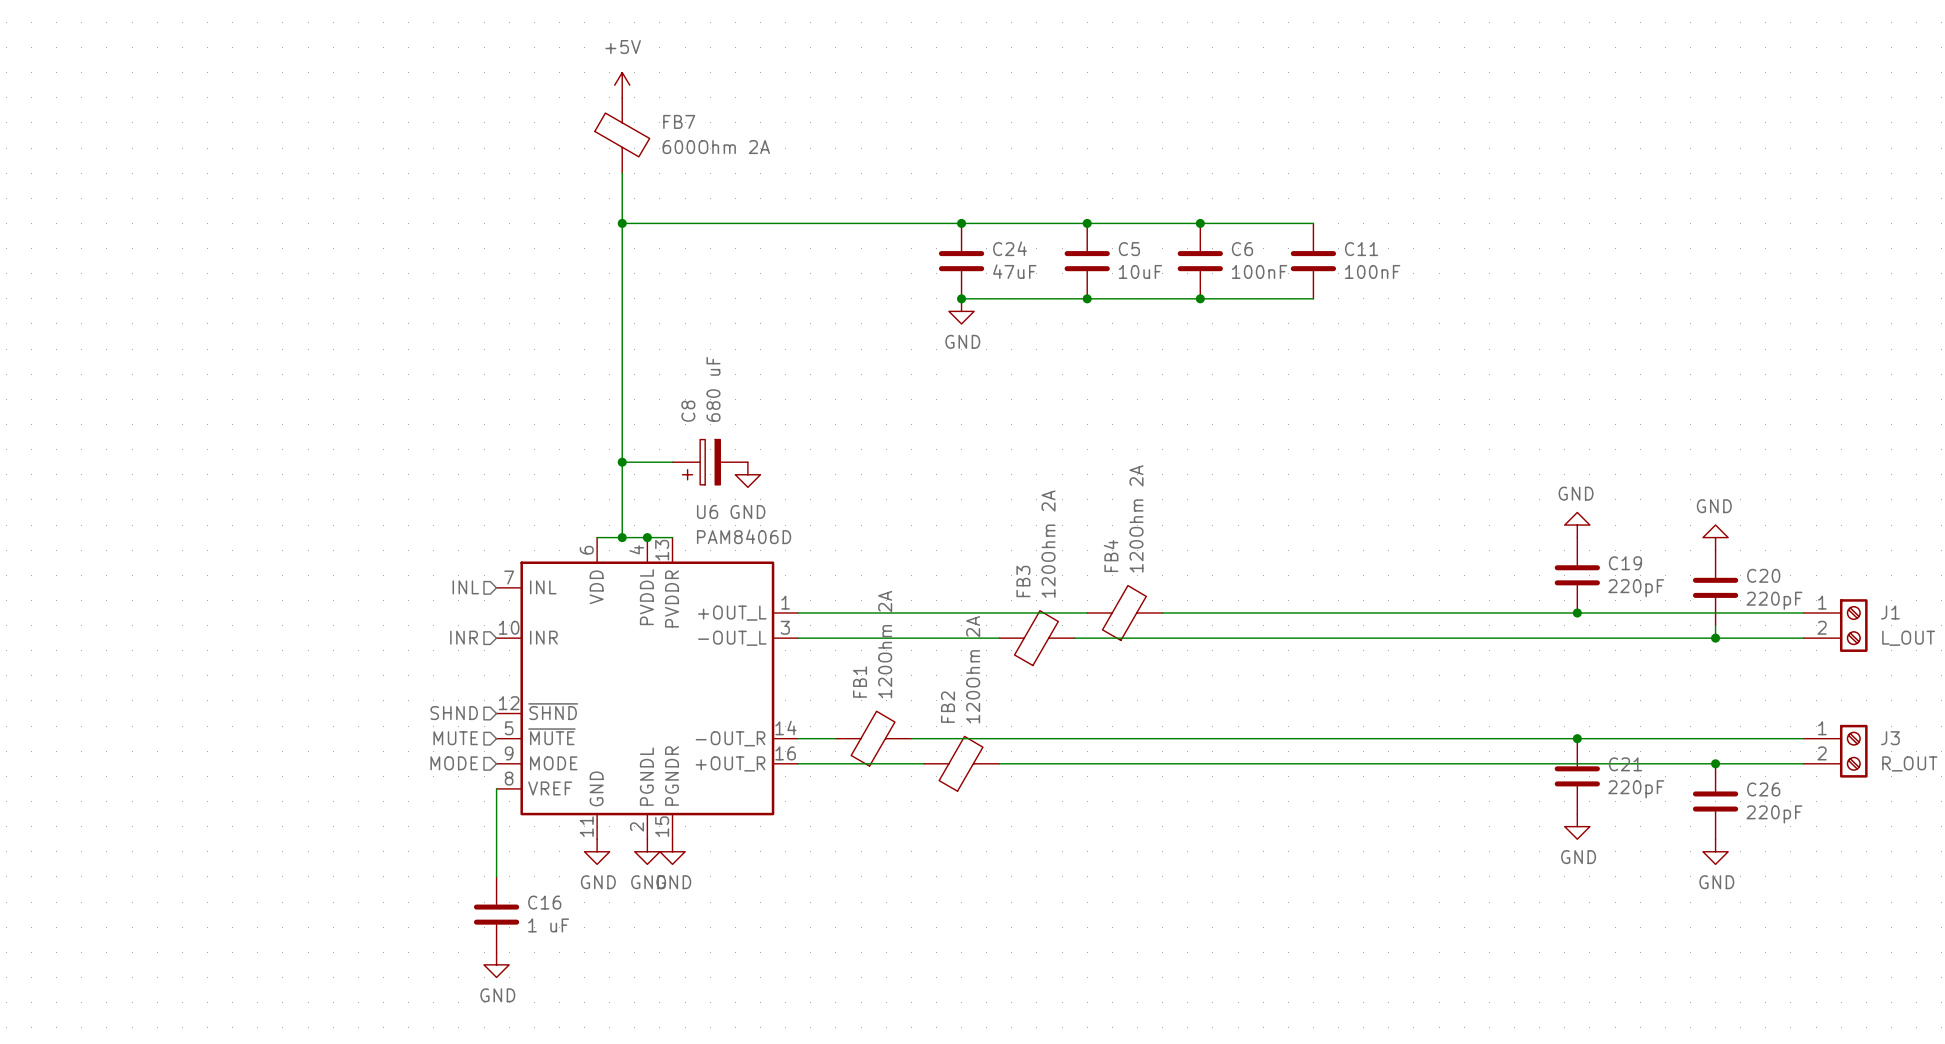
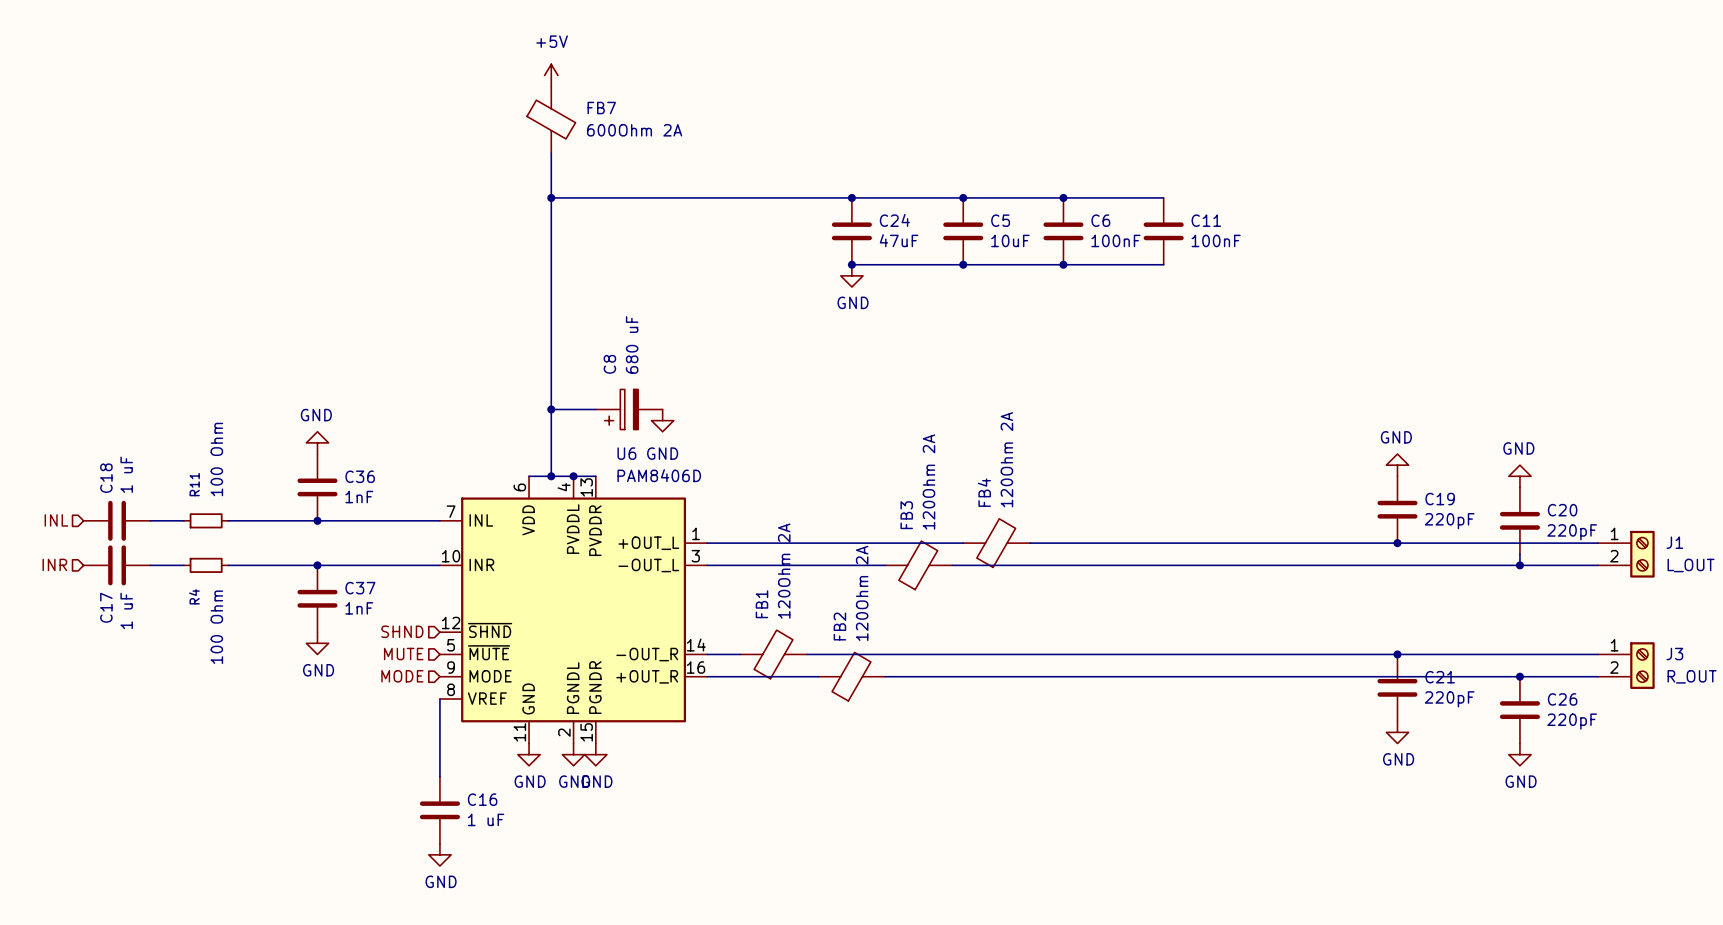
power symbol: none -> GND (317, 442)
C36: none -> 1nF (317, 487)
hierarchical label: none -> INL (56, 520)
C18: none -> 1 uF (117, 520)
wire: none -> (150, 520) (183, 520)
R11: none -> 100 Ohm (206, 520)
wire: none -> (228, 520) (439, 520)
junction: none -> (317, 520)
hierarchical label: INL (465, 587) -> none
hierarchical label: none -> INR (54, 564)
hierarchical label: INR (464, 637) -> none
C17: none -> 1 uF (117, 565)
wire: none -> (150, 565) (183, 565)
R4: none -> 100 Ohm (206, 565)
wire: none -> (228, 565) (439, 565)
junction: none -> (317, 565)
C37: none -> 1nF (317, 598)
power symbol: none -> GND (317, 643)

